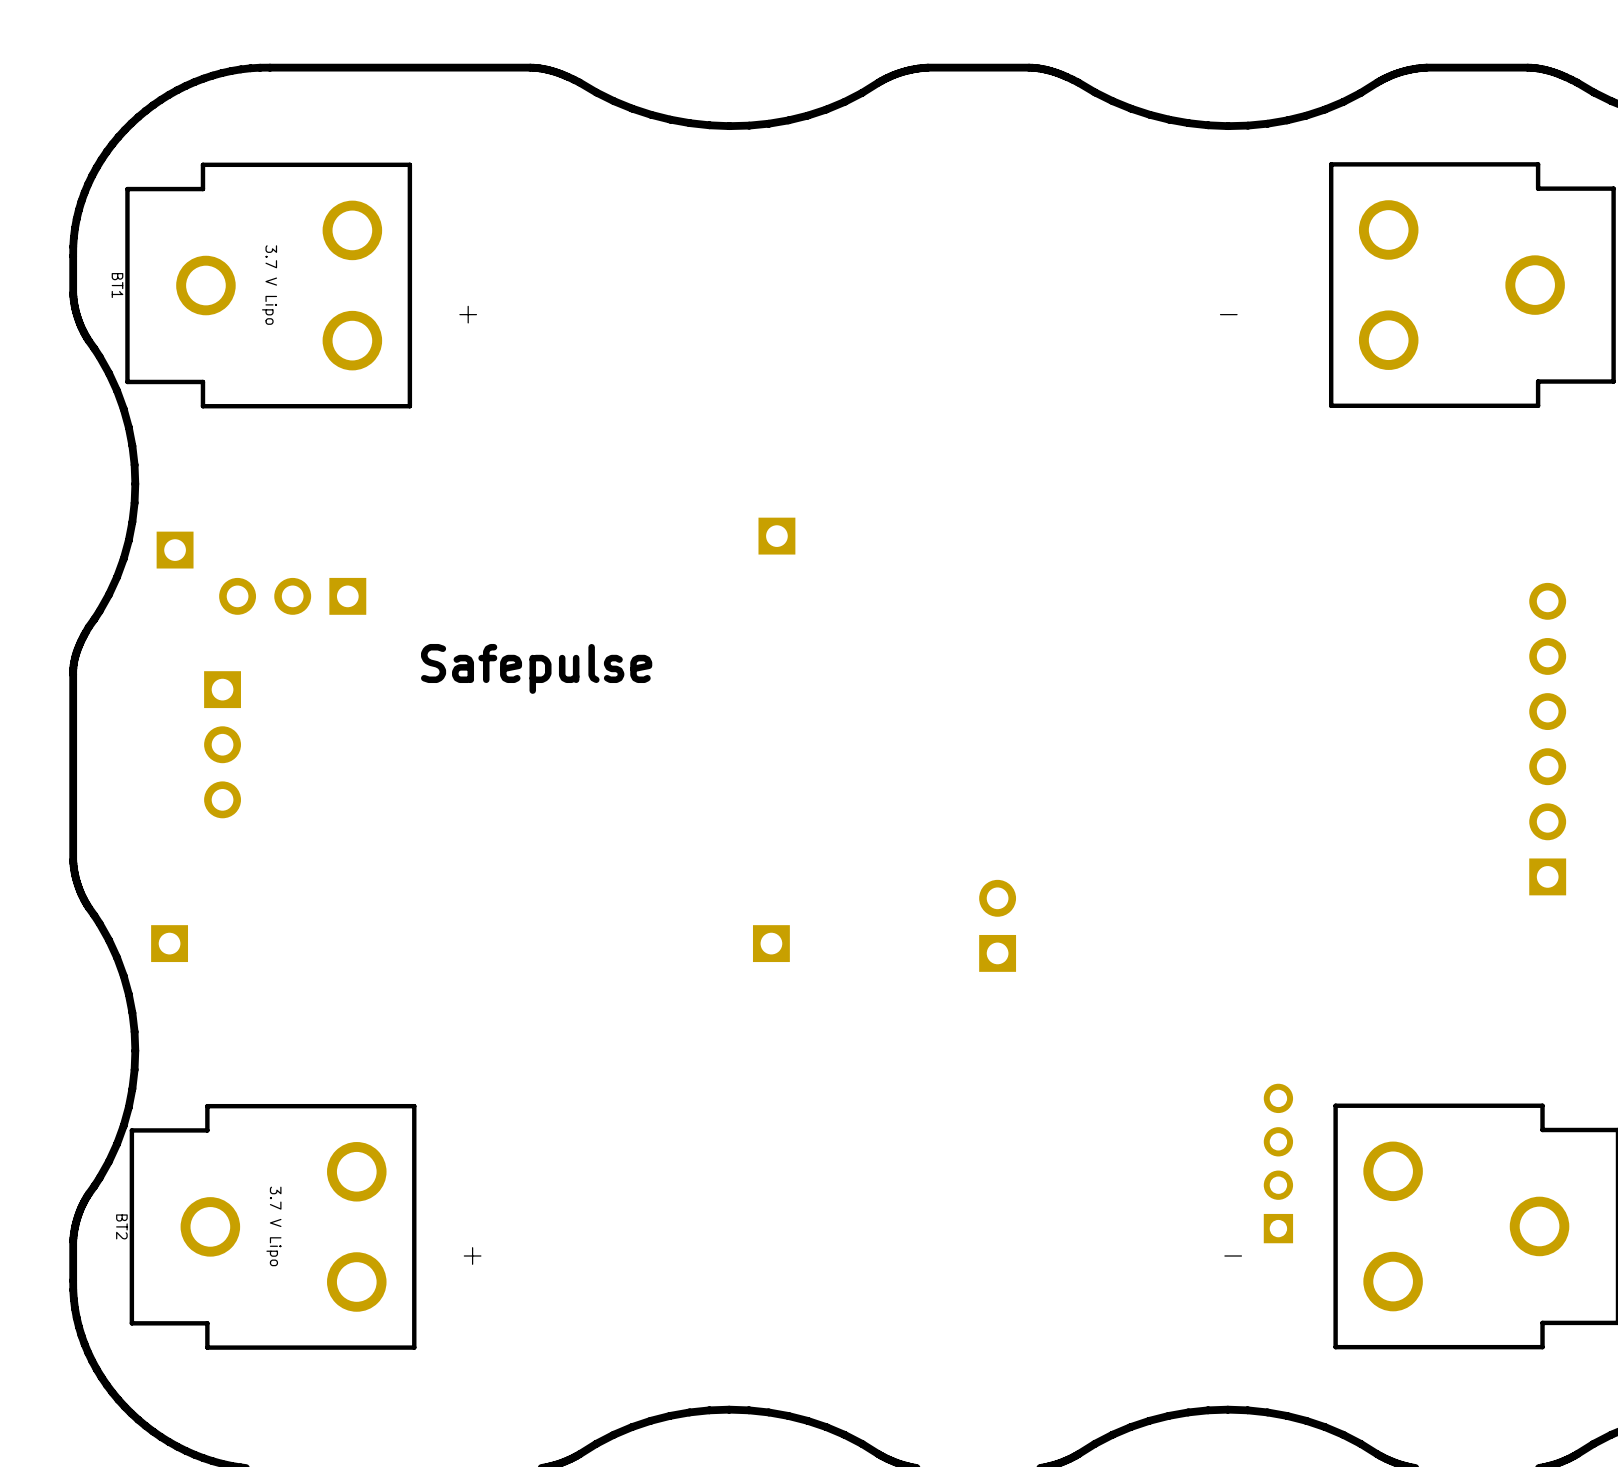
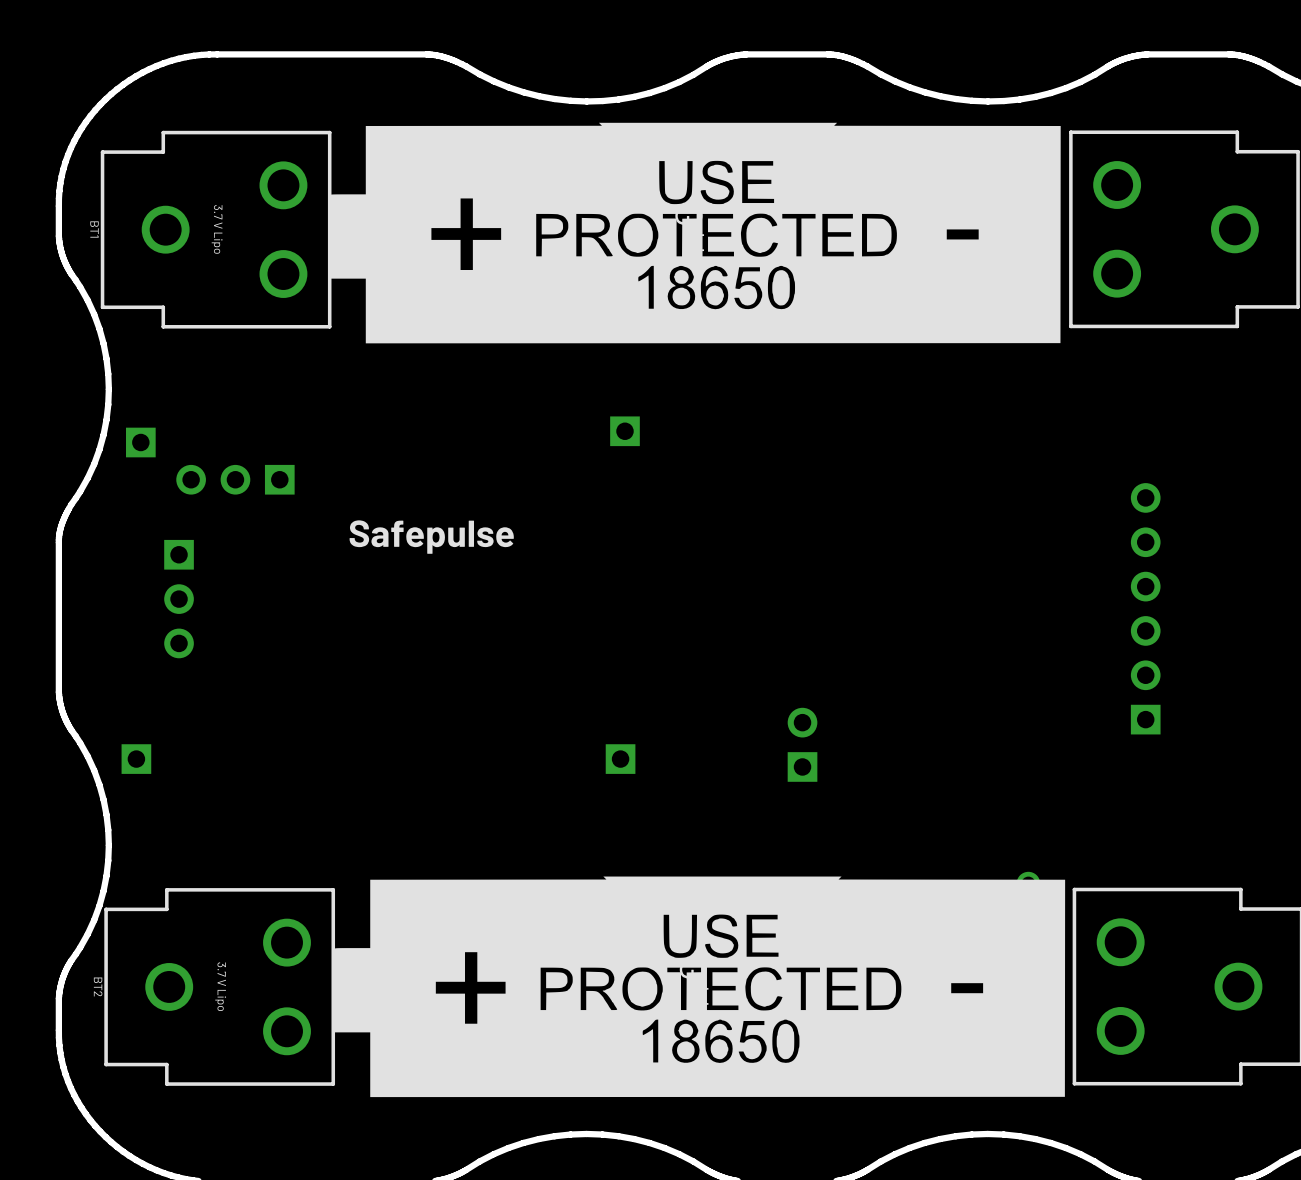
part: none -> (694, 233)
part position: (1547, 739) -> (1145, 608)
part: none -> (698, 986)

